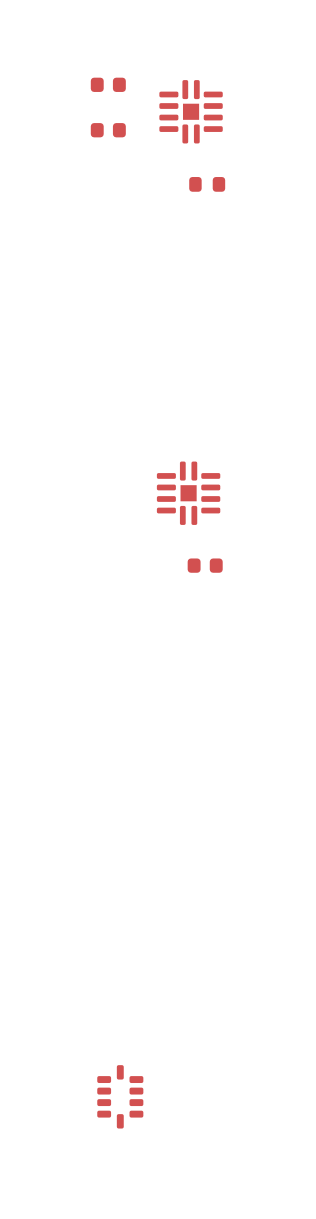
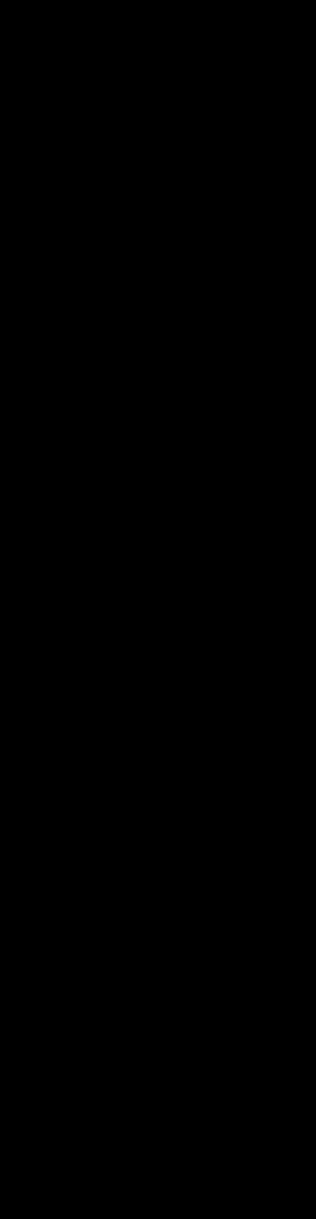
part: (108, 84) -> none
part: (191, 111) -> none
part: (108, 130) -> none
part: (207, 184) -> none
part: (188, 493) -> none
part: (205, 565) -> none
part: (120, 1096) -> none

